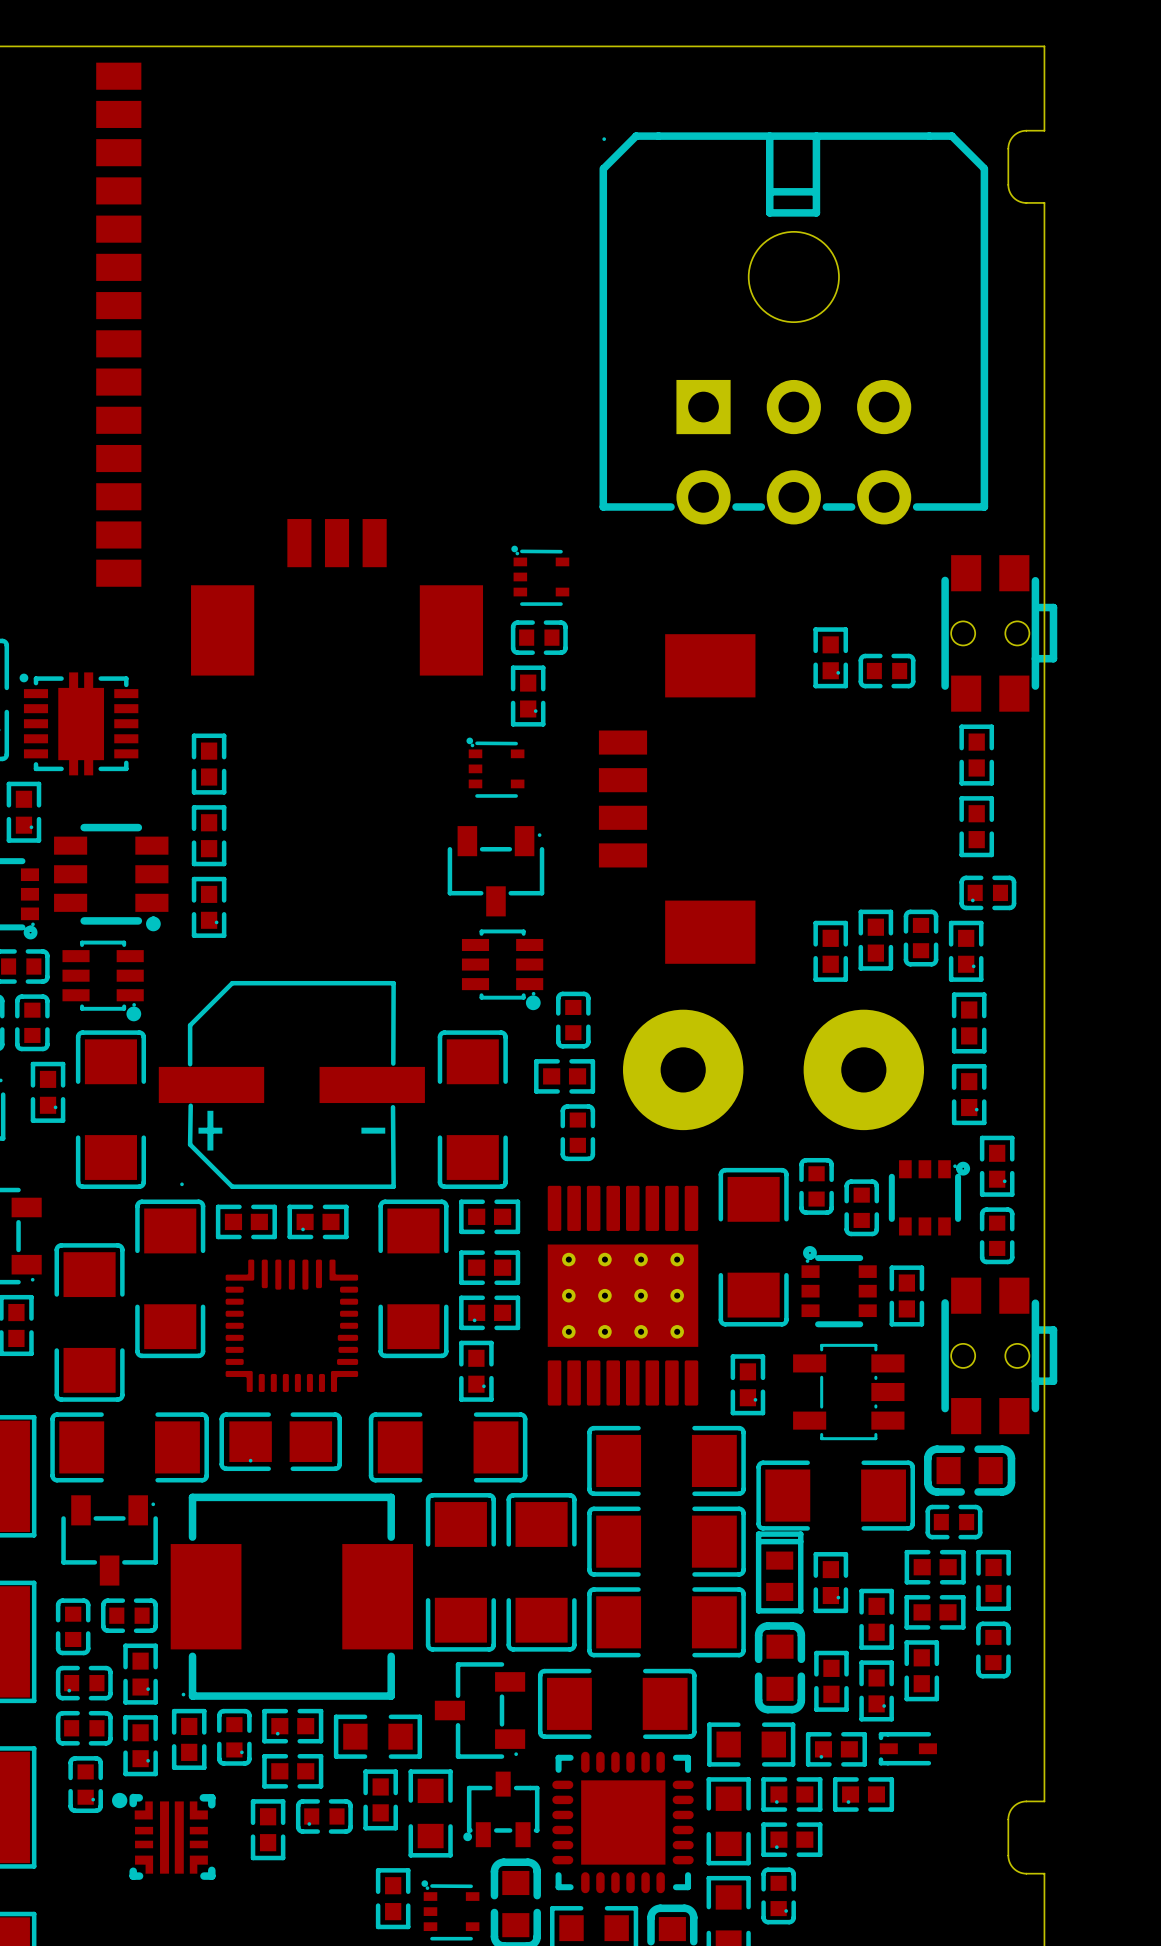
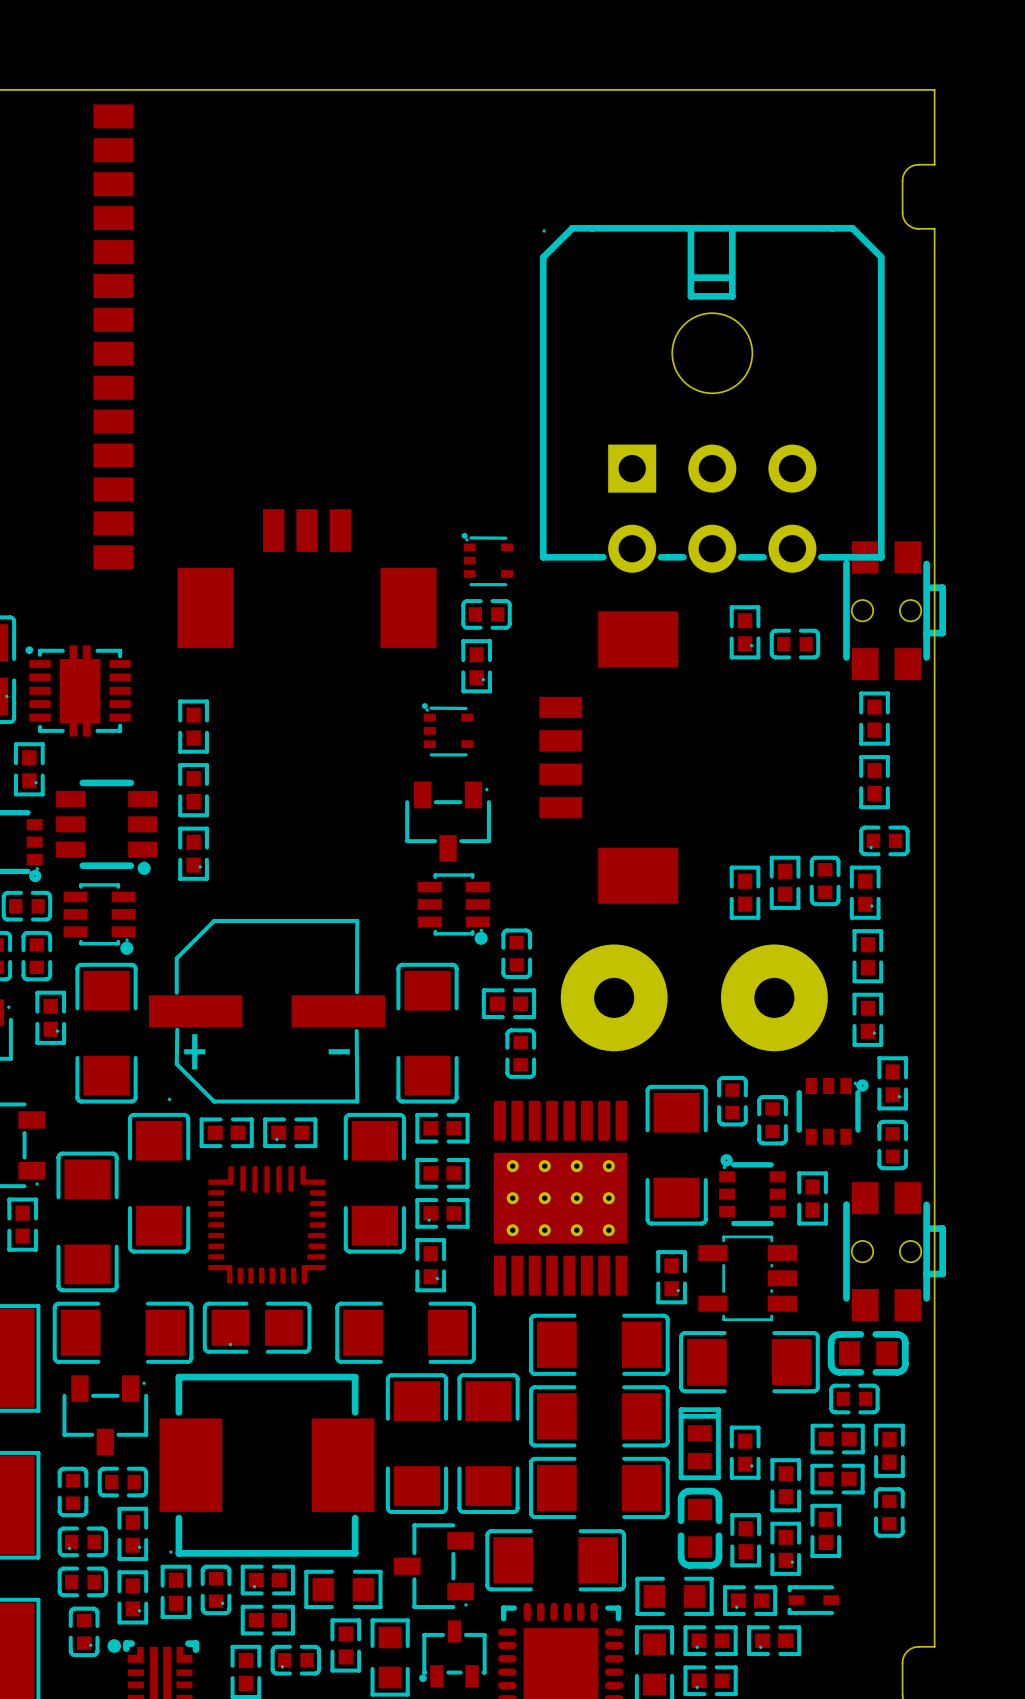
part position: (793, 328) -> (712, 398)
part position: (848, 1392) -> (747, 1278)
part position: (835, 1495) -> (749, 1362)

